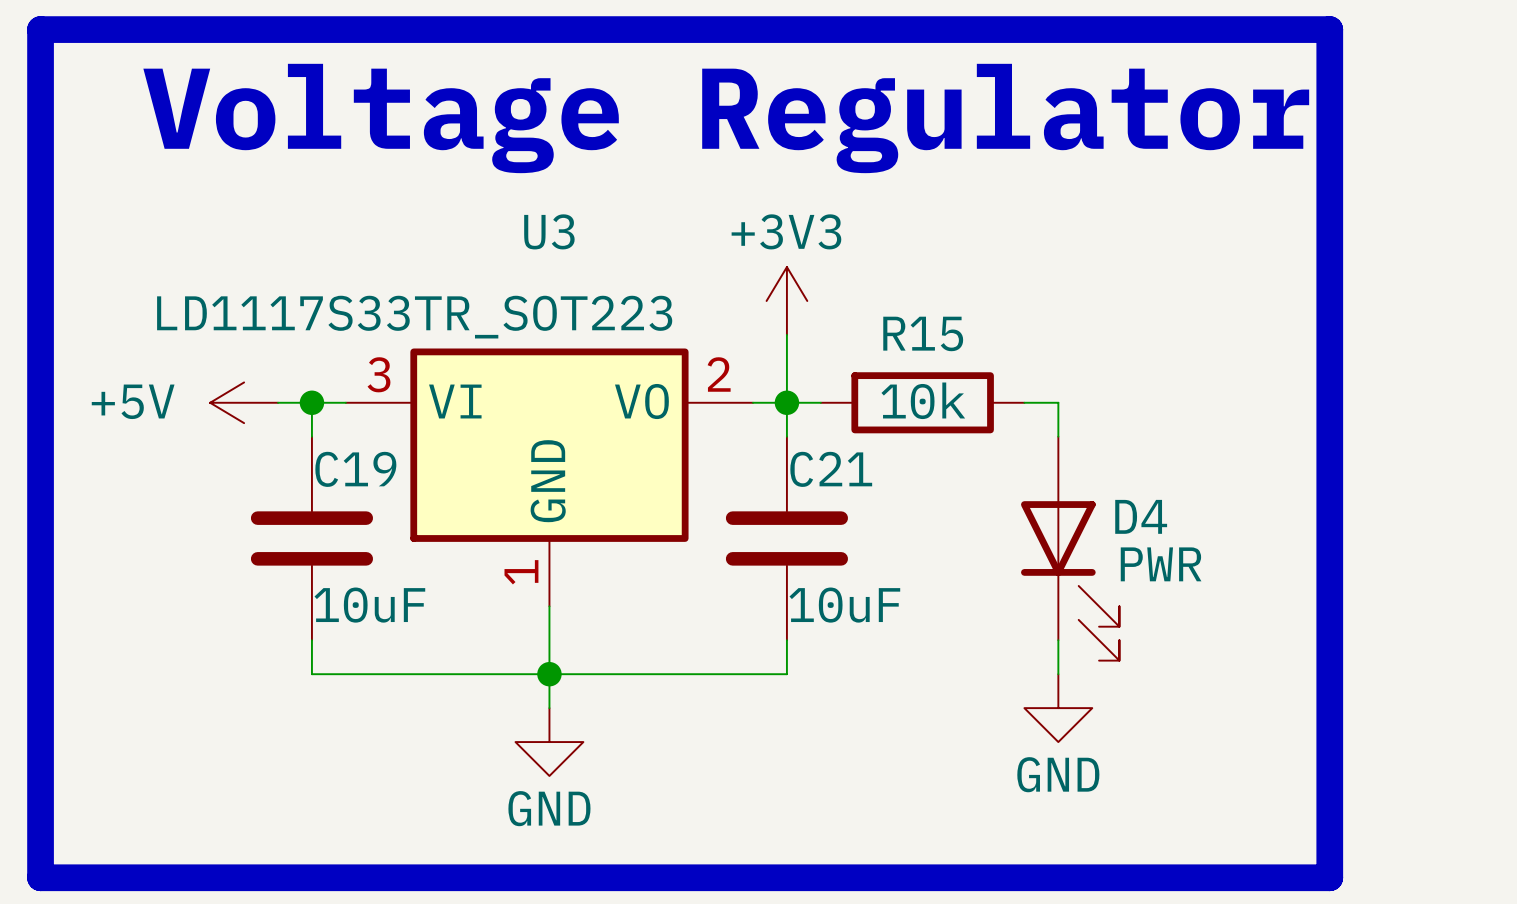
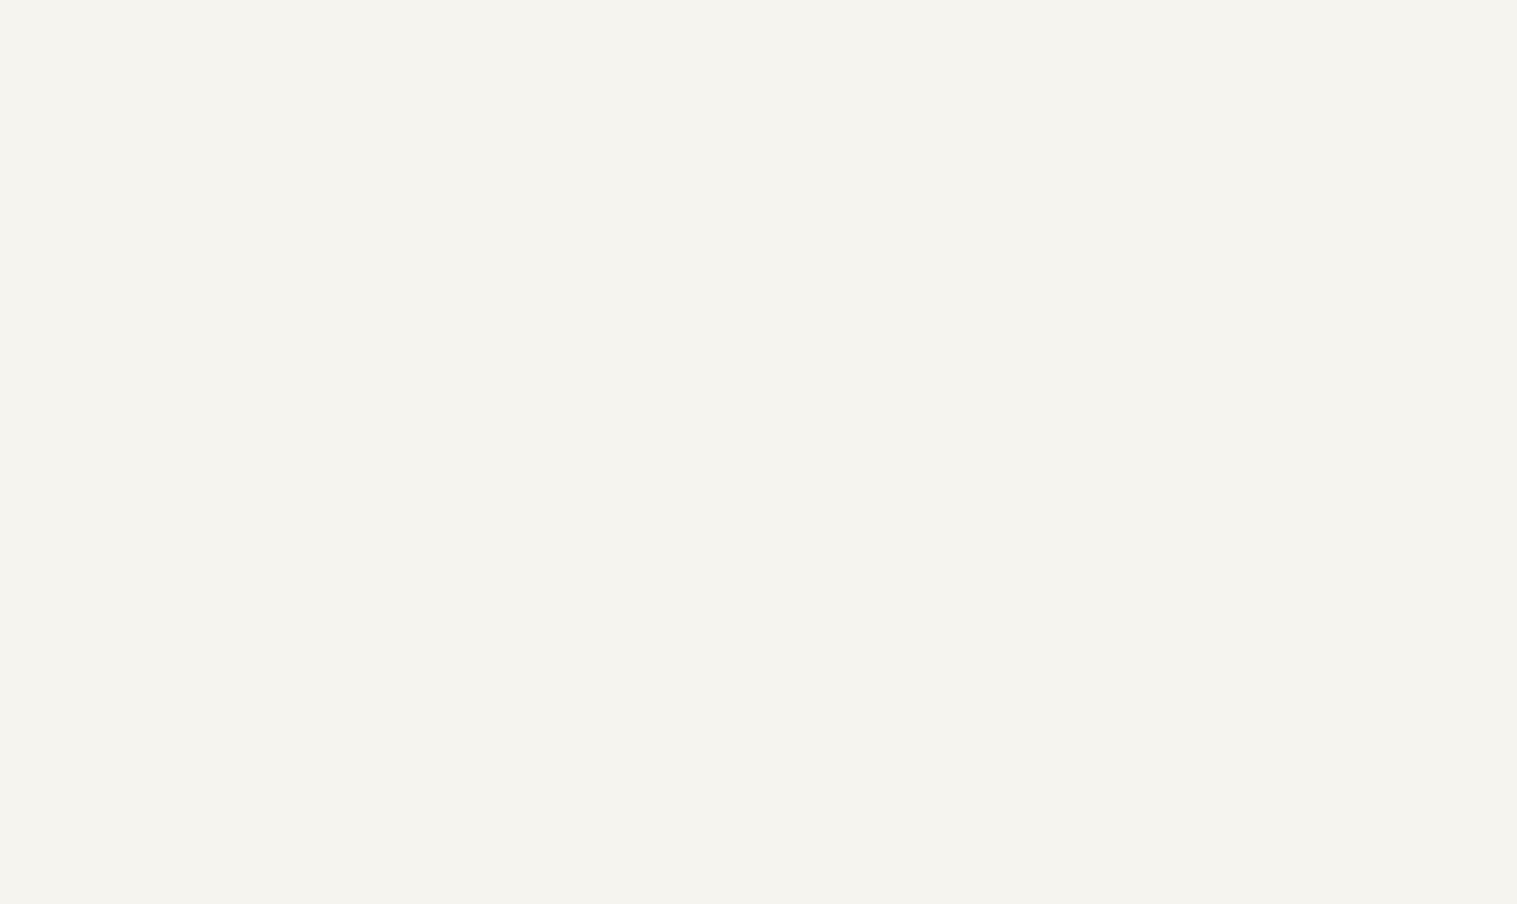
line: (40, 29) (1329, 29) (1329, 877) (40, 877) (40, 29) -> none
text: Voltage Regulator (726, 118) -> none
power symbol: +3V3 (786, 301) -> none
wire: (786, 334) (786, 436) -> none
power symbol: +5V (244, 402) -> none
wire: (278, 402) (345, 402) -> none
wire: (311, 402) (311, 436) -> none
junction: (311, 402) -> none
wire: (753, 402) (820, 402) -> none
junction: (786, 402) -> none
R15: 10k (922, 402) -> none
wire: (1024, 402) (1058, 402) (1058, 436) -> none
U3: LD1117S33TR_SOT223 (549, 477) -> none
C19: 10uF (311, 538) -> none
C21: 10uF (786, 538) -> none
D4: PWR (1070, 548) -> none
wire: (549, 606) (549, 708) -> none
wire: (311, 640) (311, 674) (786, 674) (786, 640) -> none
wire: (1058, 640) (1058, 674) -> none
junction: (549, 674) -> none
power symbol: GND (1058, 708) -> none
power symbol: GND (549, 742) -> none

